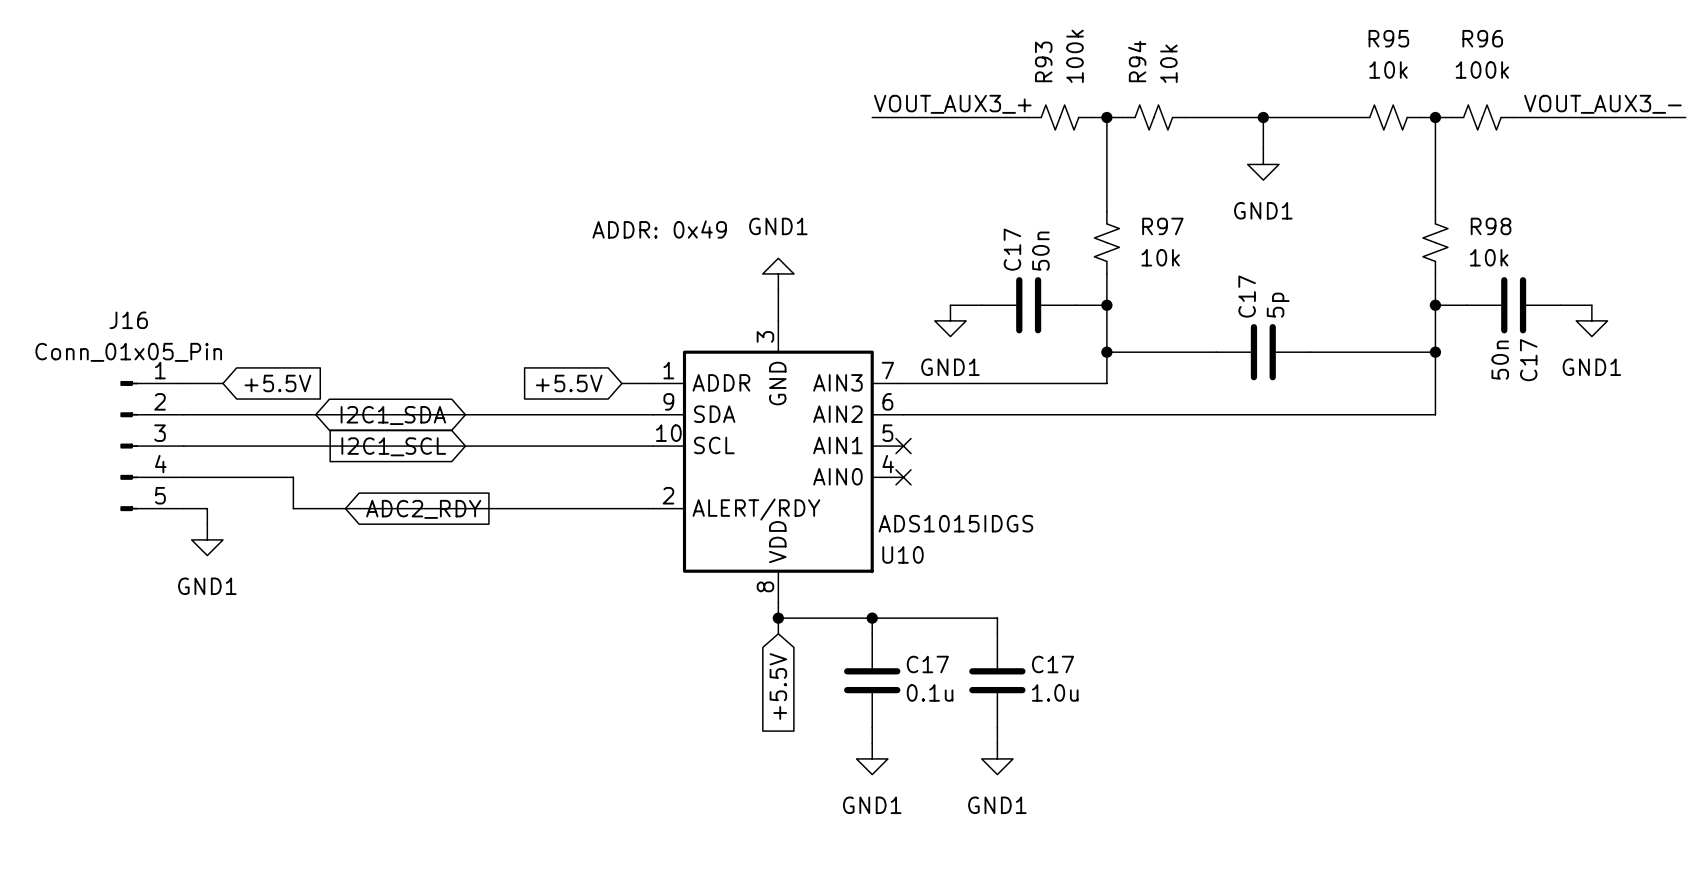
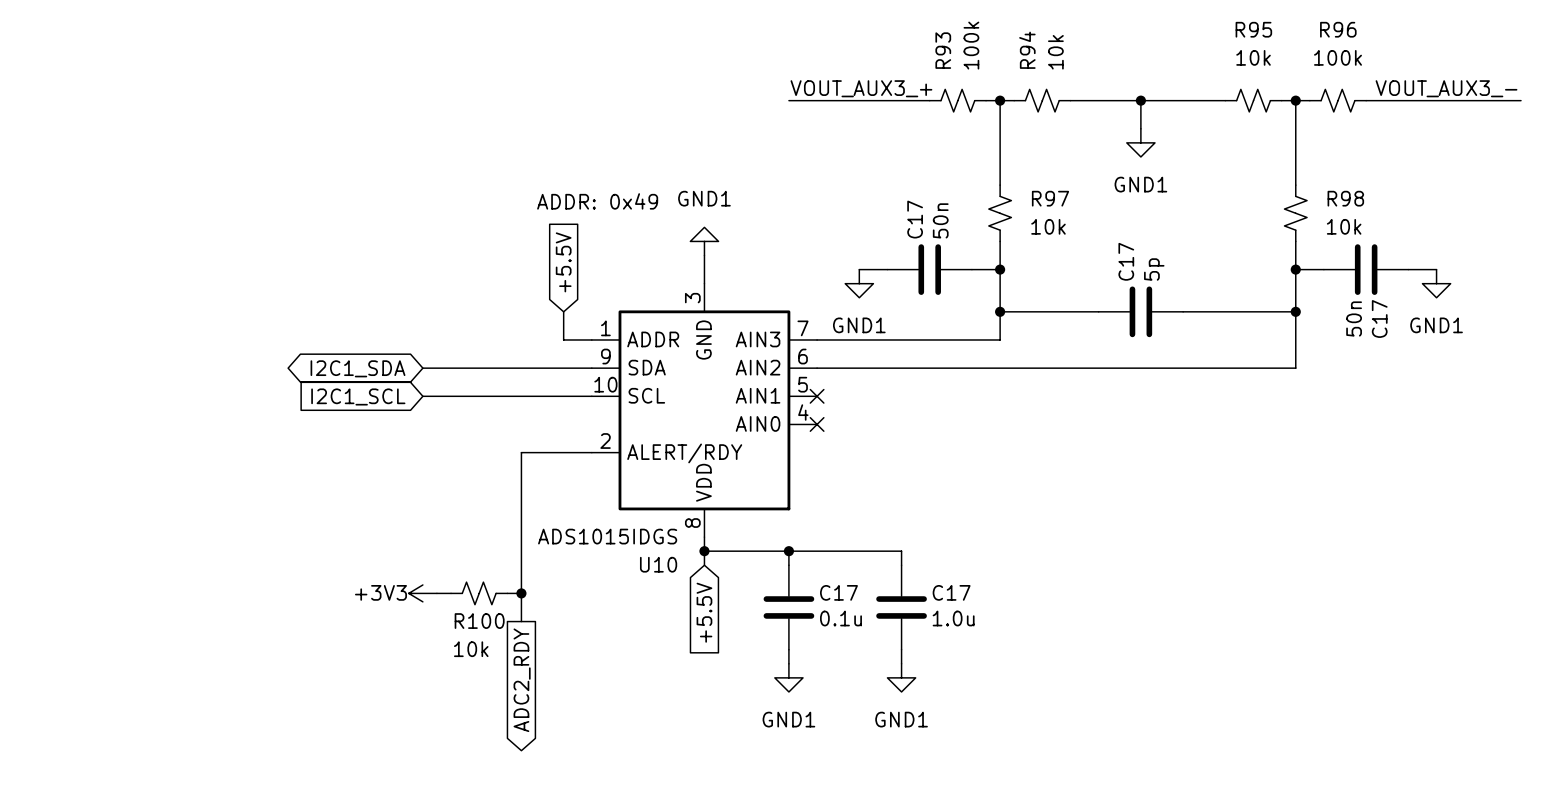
wire: none -> (563, 311) (563, 339)
wire: (183, 383) (222, 383) -> none
global label: +5.5V (277, 383) -> none
global label rotation: 0° (569, 383) -> 90° clockwise (563, 262)
wire: (183, 414) (465, 414) -> none
J16: Conn_01x05_Pin (152, 446) -> none
wire: (183, 446) (465, 446) -> none
wire: (183, 477) (293, 477) (293, 508) (574, 508) -> (521, 621) (521, 452)
wire: (183, 508) (207, 508) (207, 524) -> none
global label rotation: 0° (423, 509) -> 90° counterclockwise (522, 680)
global label position: ADC2_RDY (423, 509) -> ADC2_RDY (522, 680)
U10 value position: ADS1015IDGS (955, 523) -> ADS1015IDGS (607, 536)
power symbol: GND1 (207, 539) -> none
U10 name position: U10 (903, 554) -> U10 (658, 564)
power symbol: none -> +3V3 (422, 593)
wire: none -> (436, 593) (451, 593)
R100: none -> 10k (479, 593)
wire: none -> (507, 593) (521, 593)
junction: none -> (521, 593)

